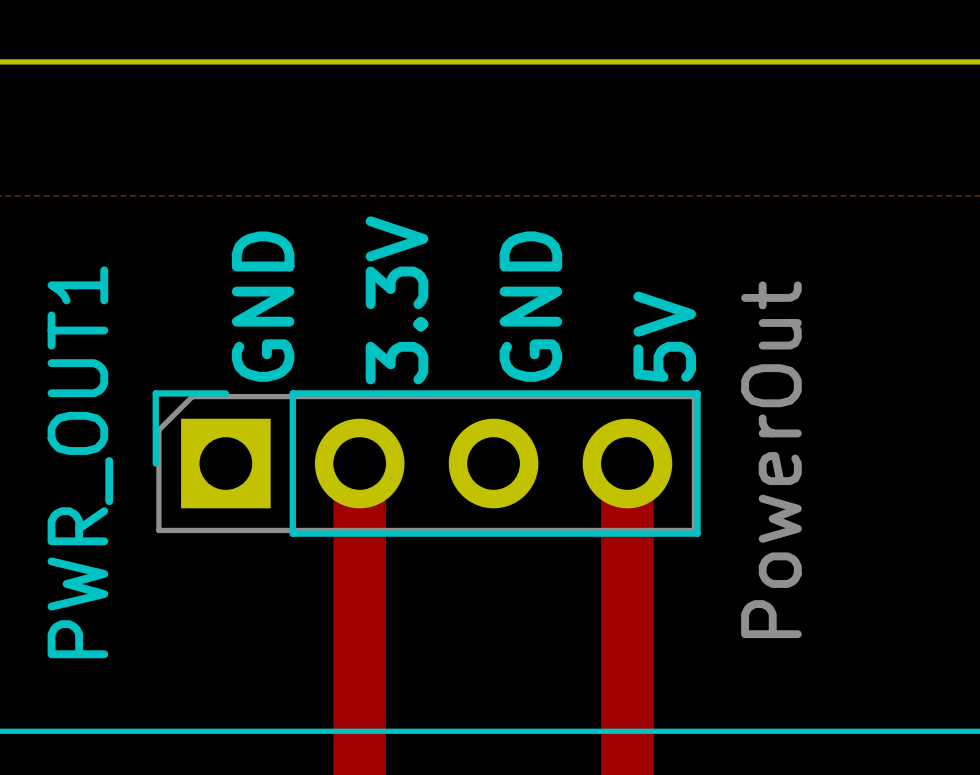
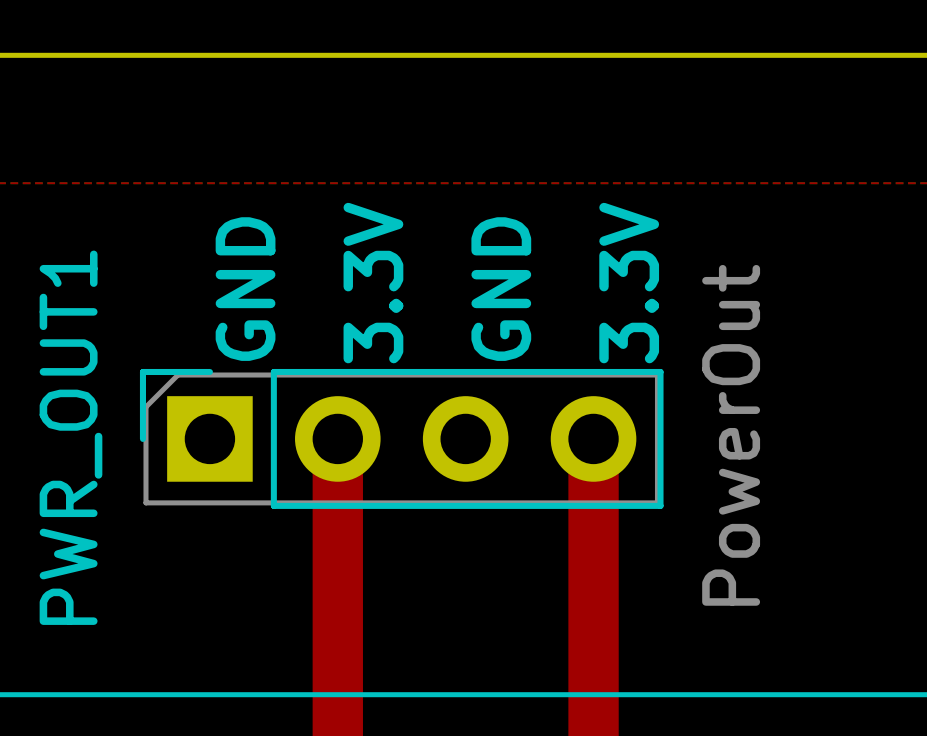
text: 5V (664, 336) -> 3.3V (629, 283)

